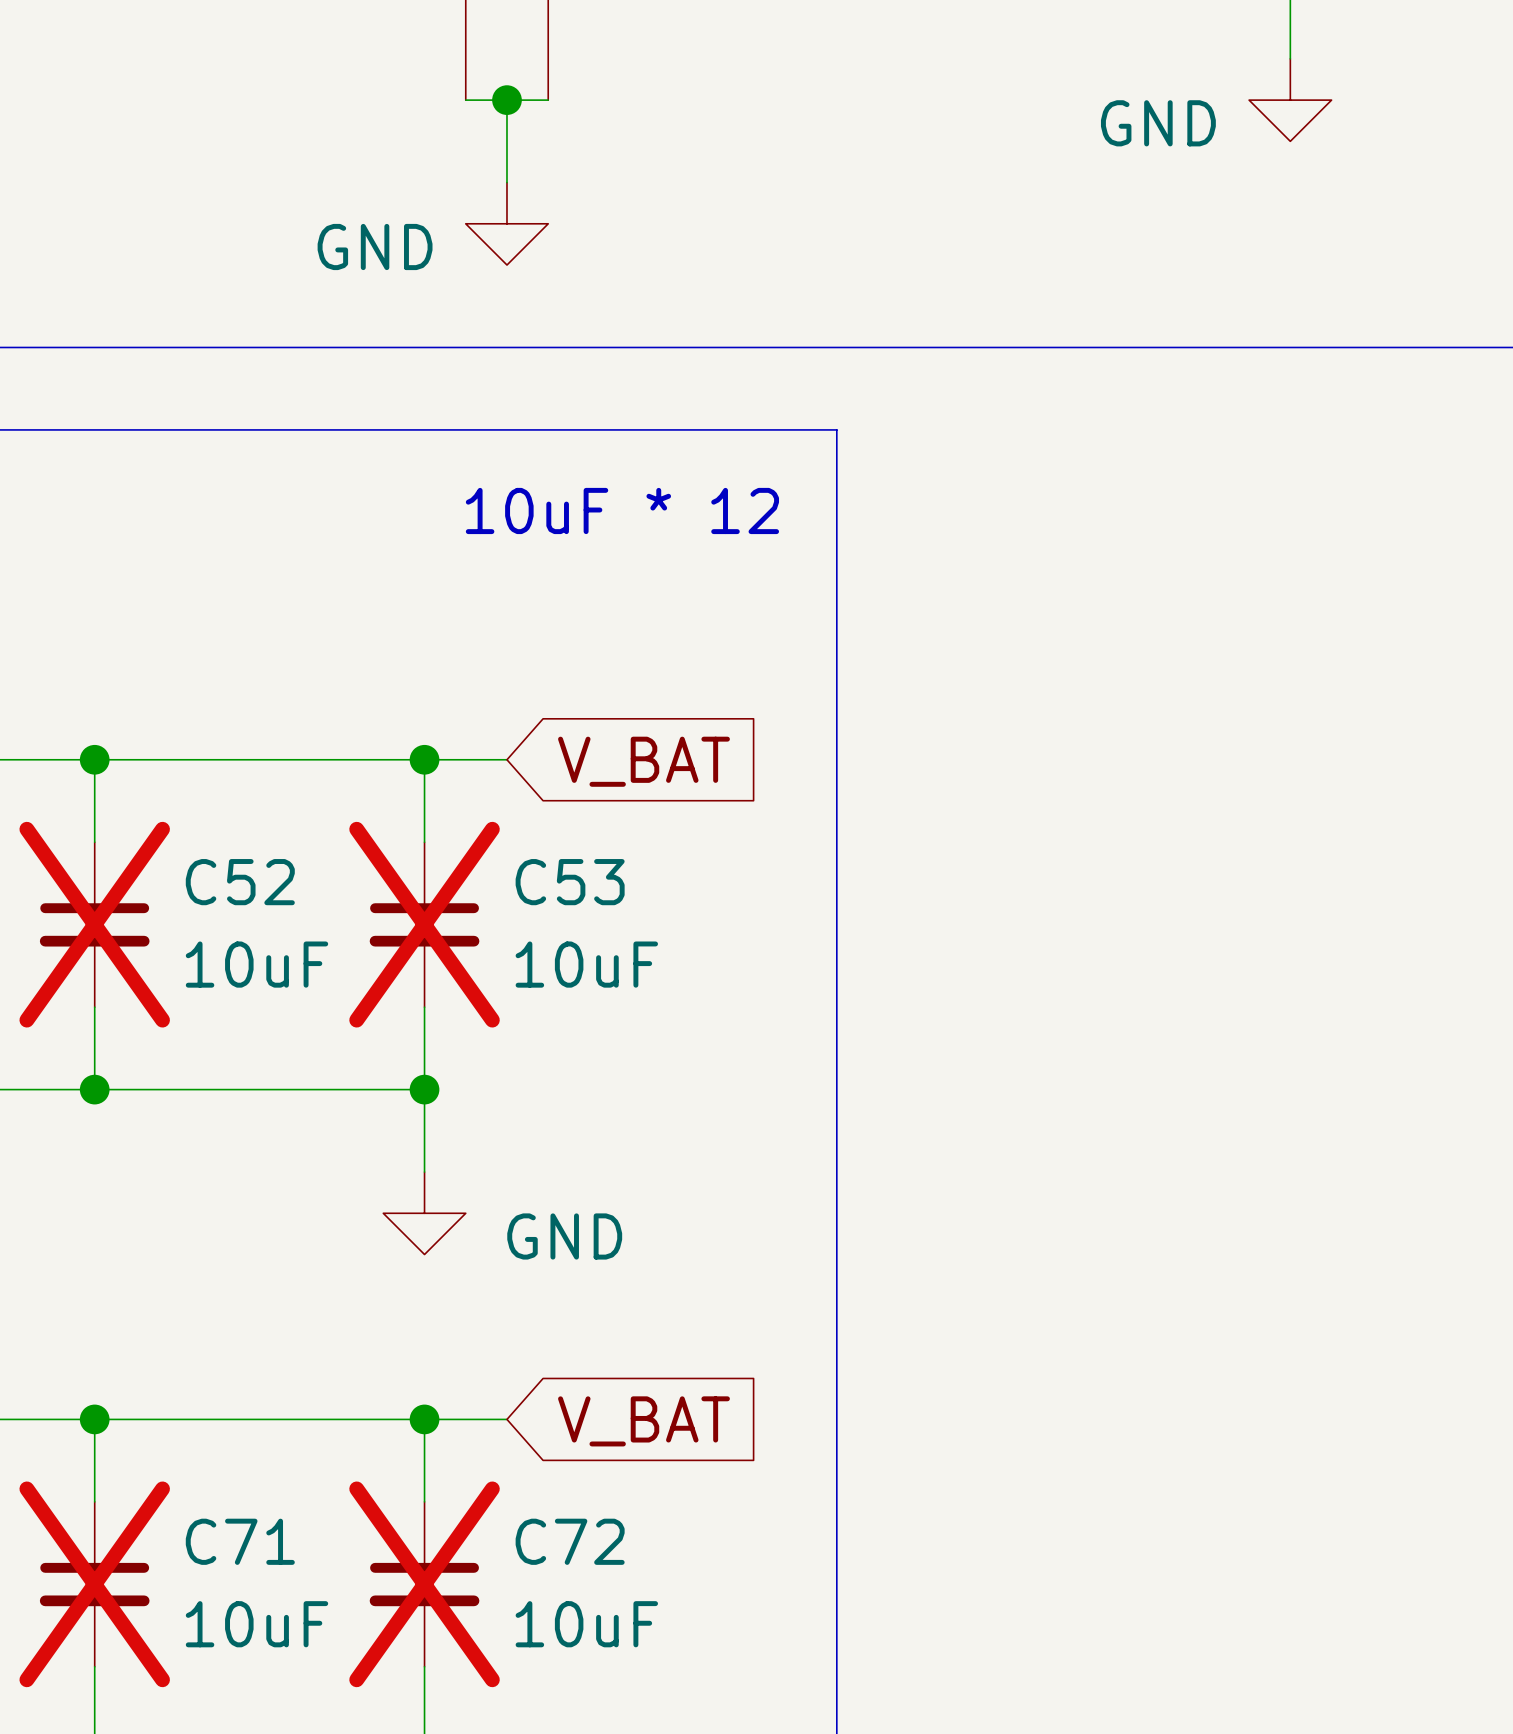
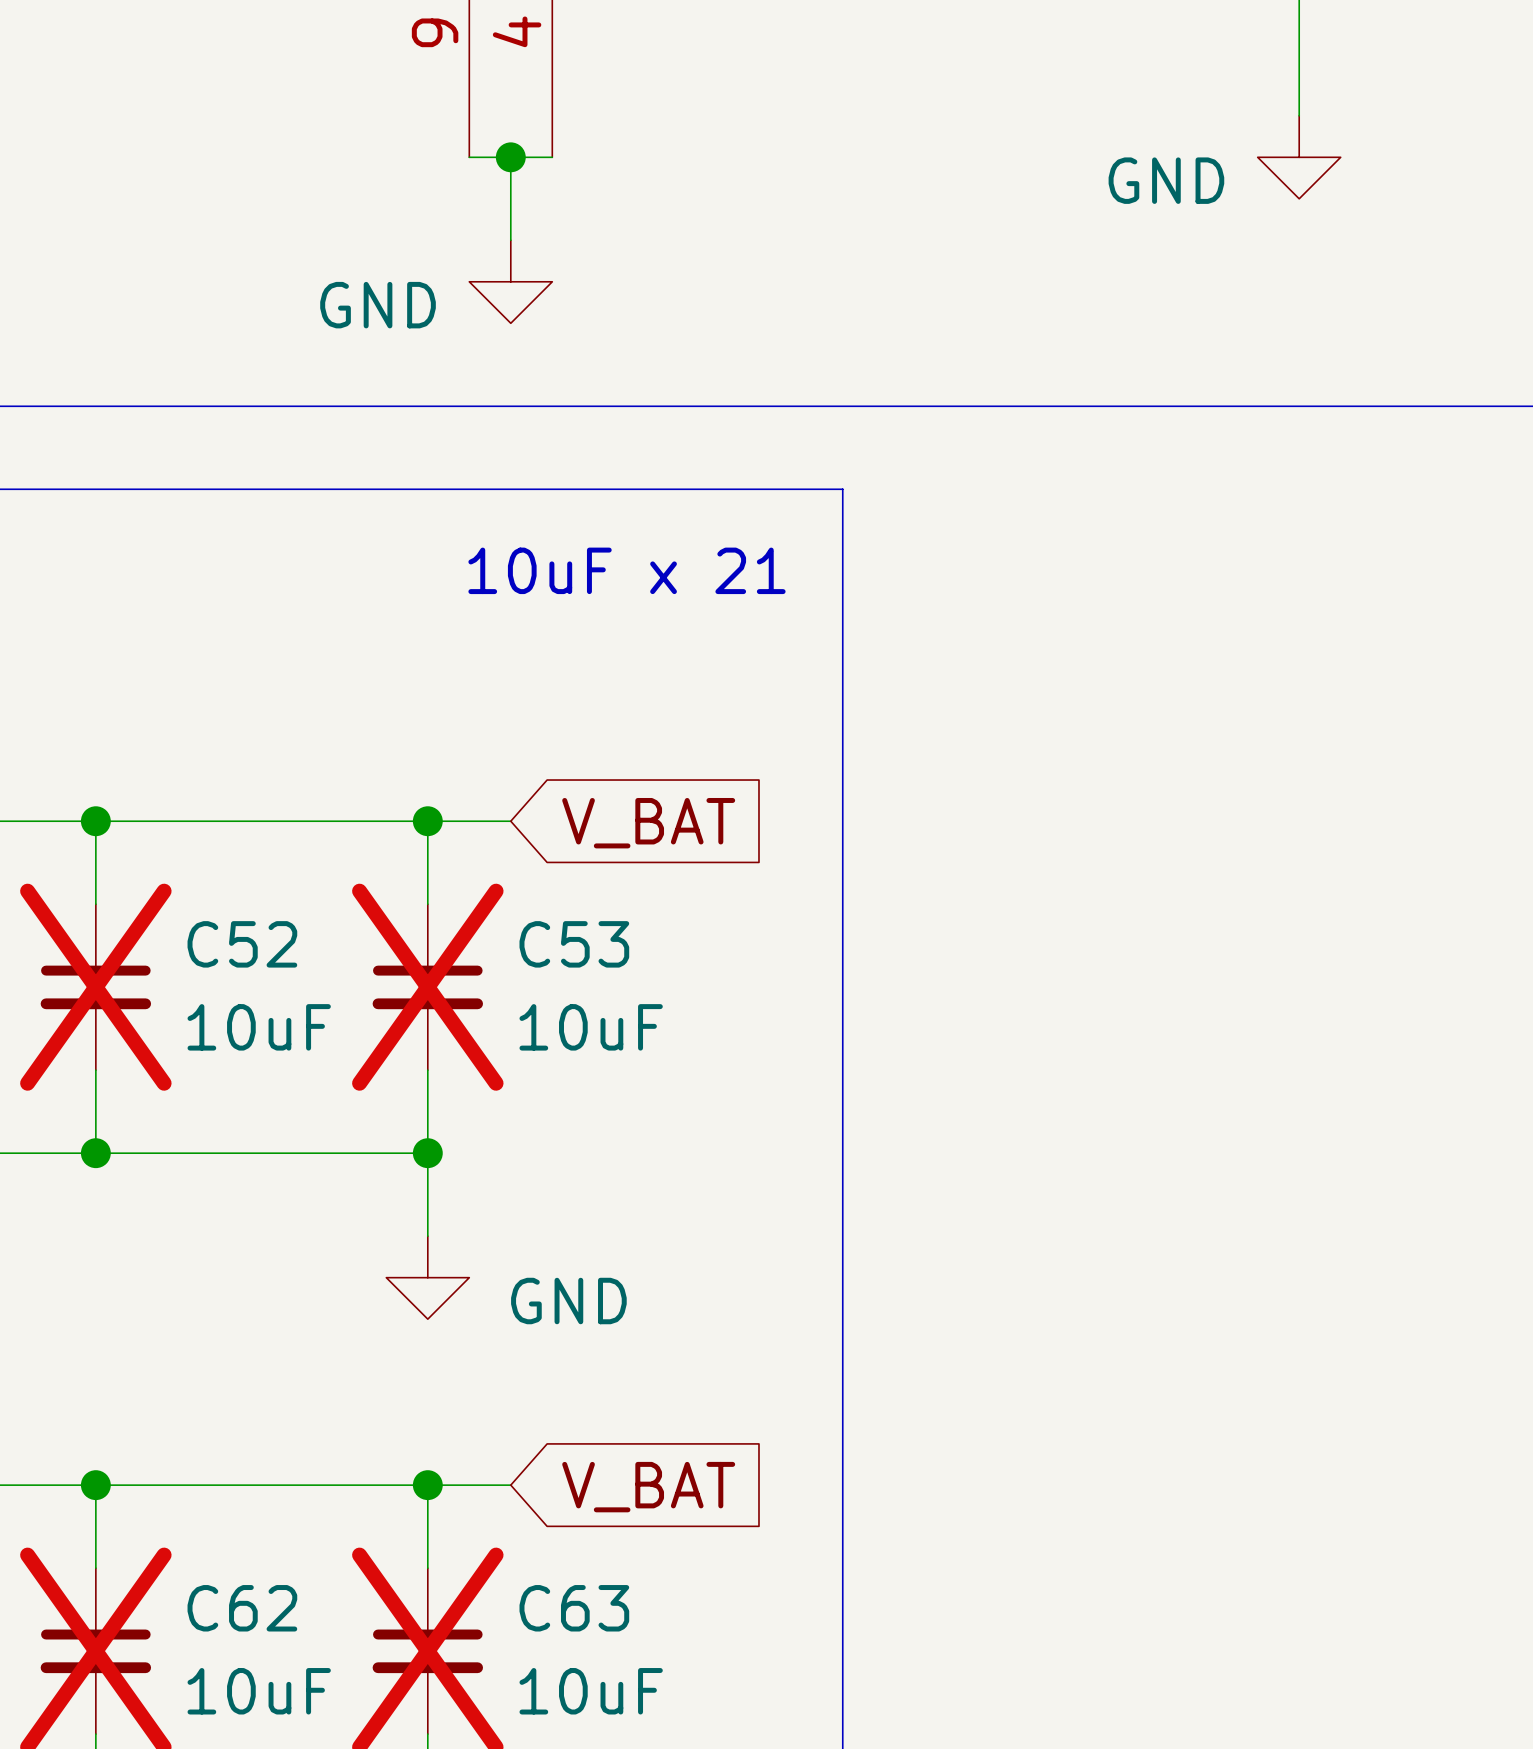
text: 10uF * 12 (622, 510) -> 10uF x 21 (626, 570)
C71 name: C71 (240, 1541) -> C62 (242, 1608)
C72 name: C72 (570, 1541) -> C63 (574, 1608)

